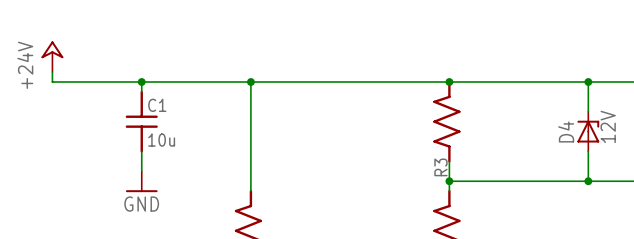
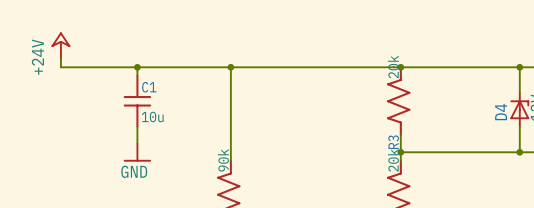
R3 value: none -> 20k (393, 66)
part value: none -> 90k (223, 160)
part value: none -> 20k (393, 160)

